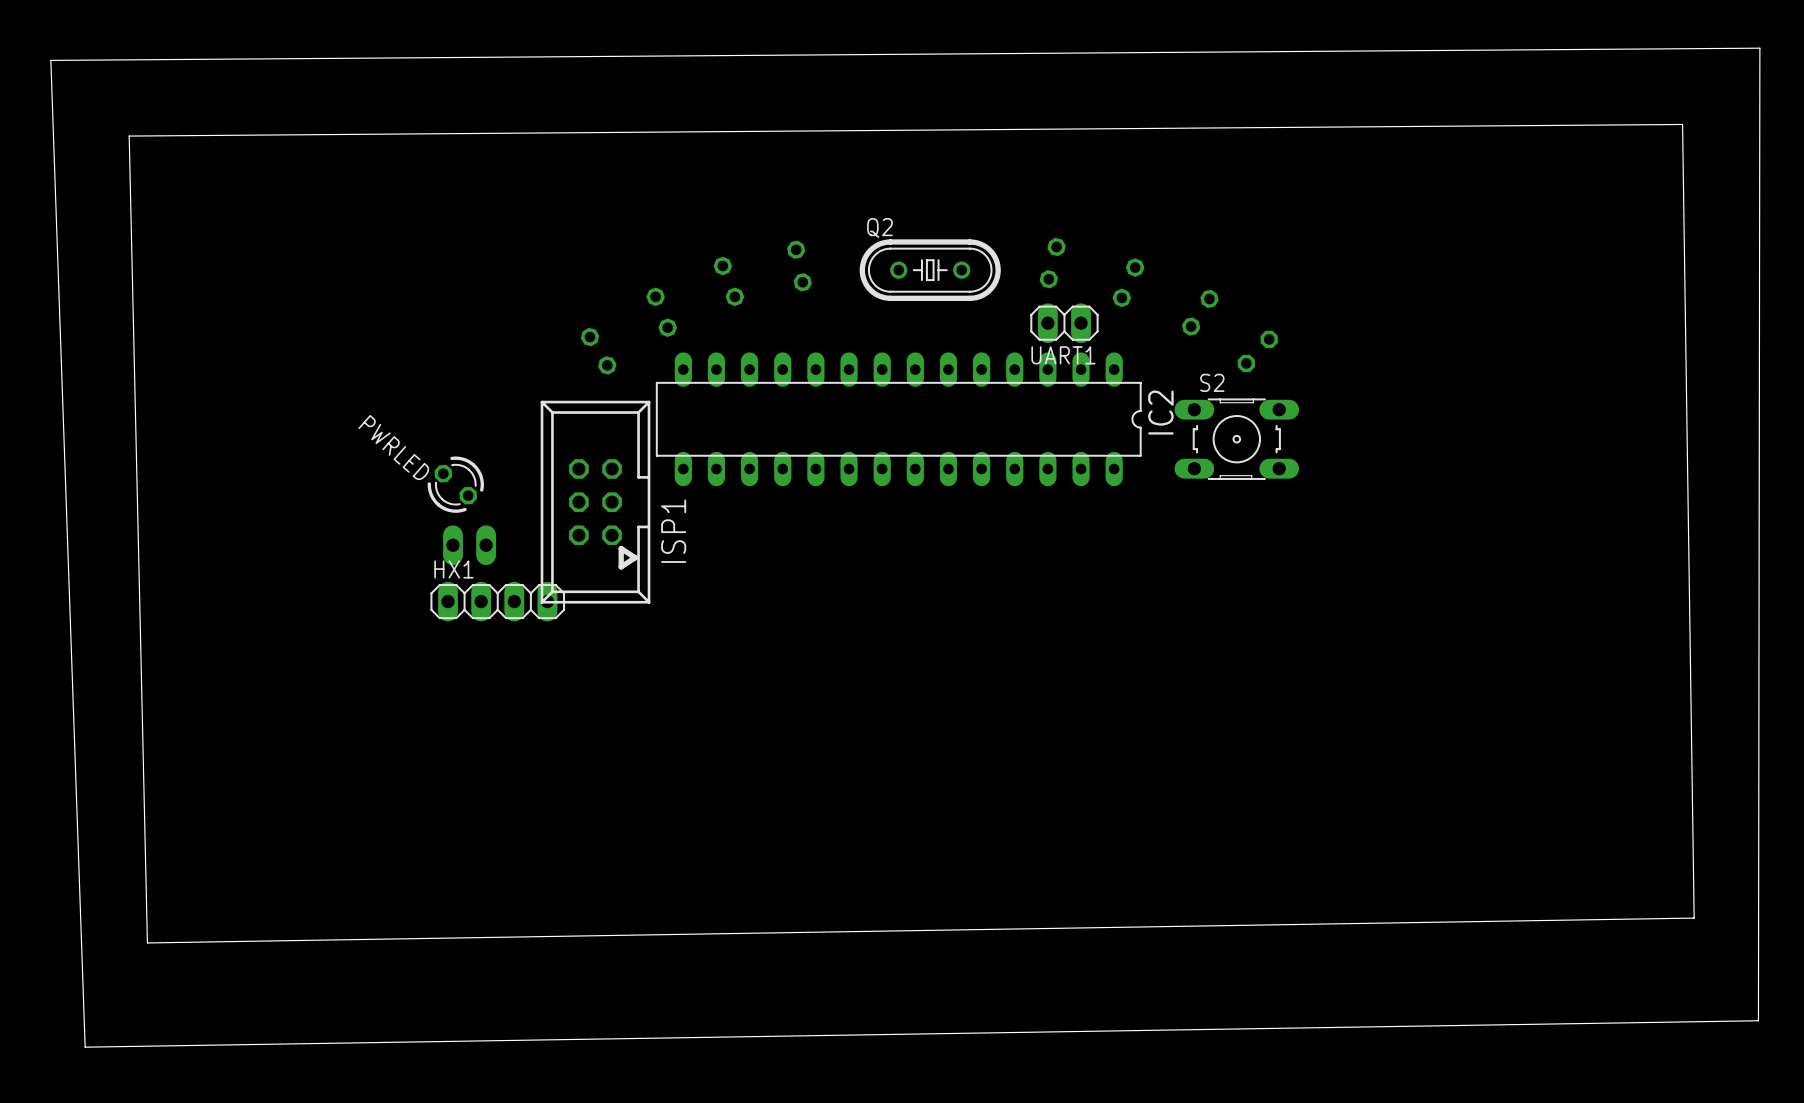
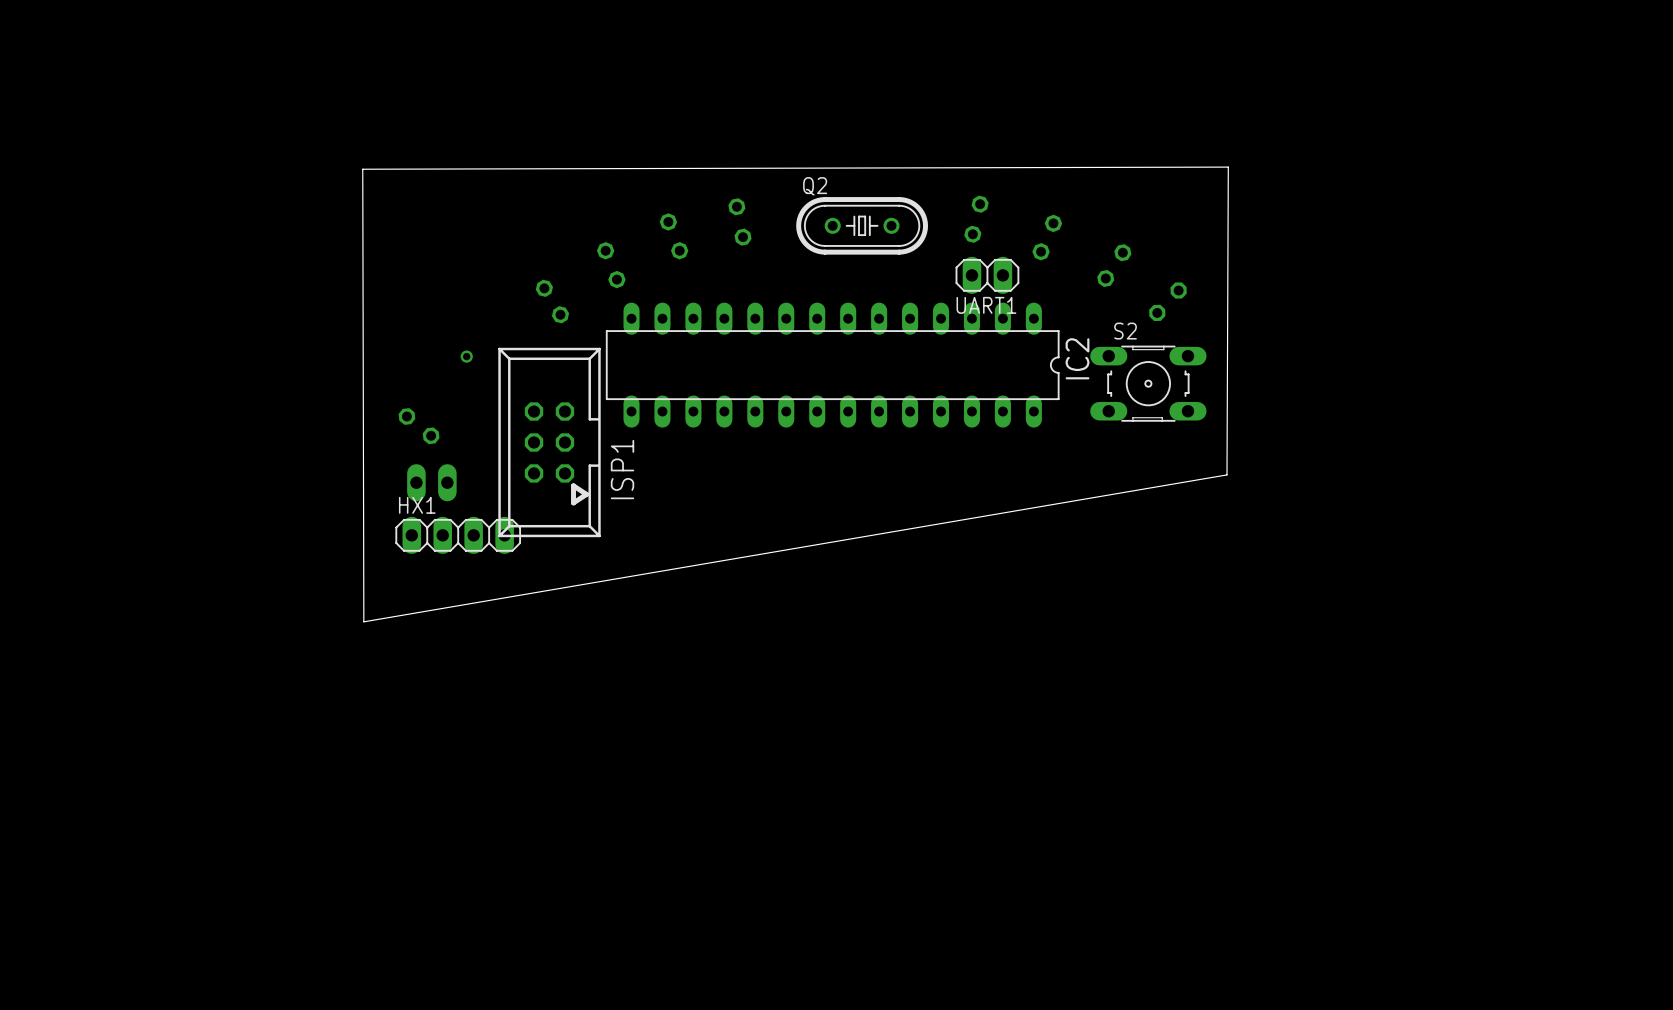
board edge: (1759, 48) (1758, 1020) (85, 1047) (50, 60) (1759, 48) -> none
board edge: (1682, 124) (129, 136) (147, 942) (1694, 918) (1682, 124) -> none
board edge: none -> (1228, 167) (1226, 474) (363, 621) (362, 169) (1228, 167)
via: none -> (466, 356)
PWRLED side: bottom (455, 484) -> top (419, 426)

